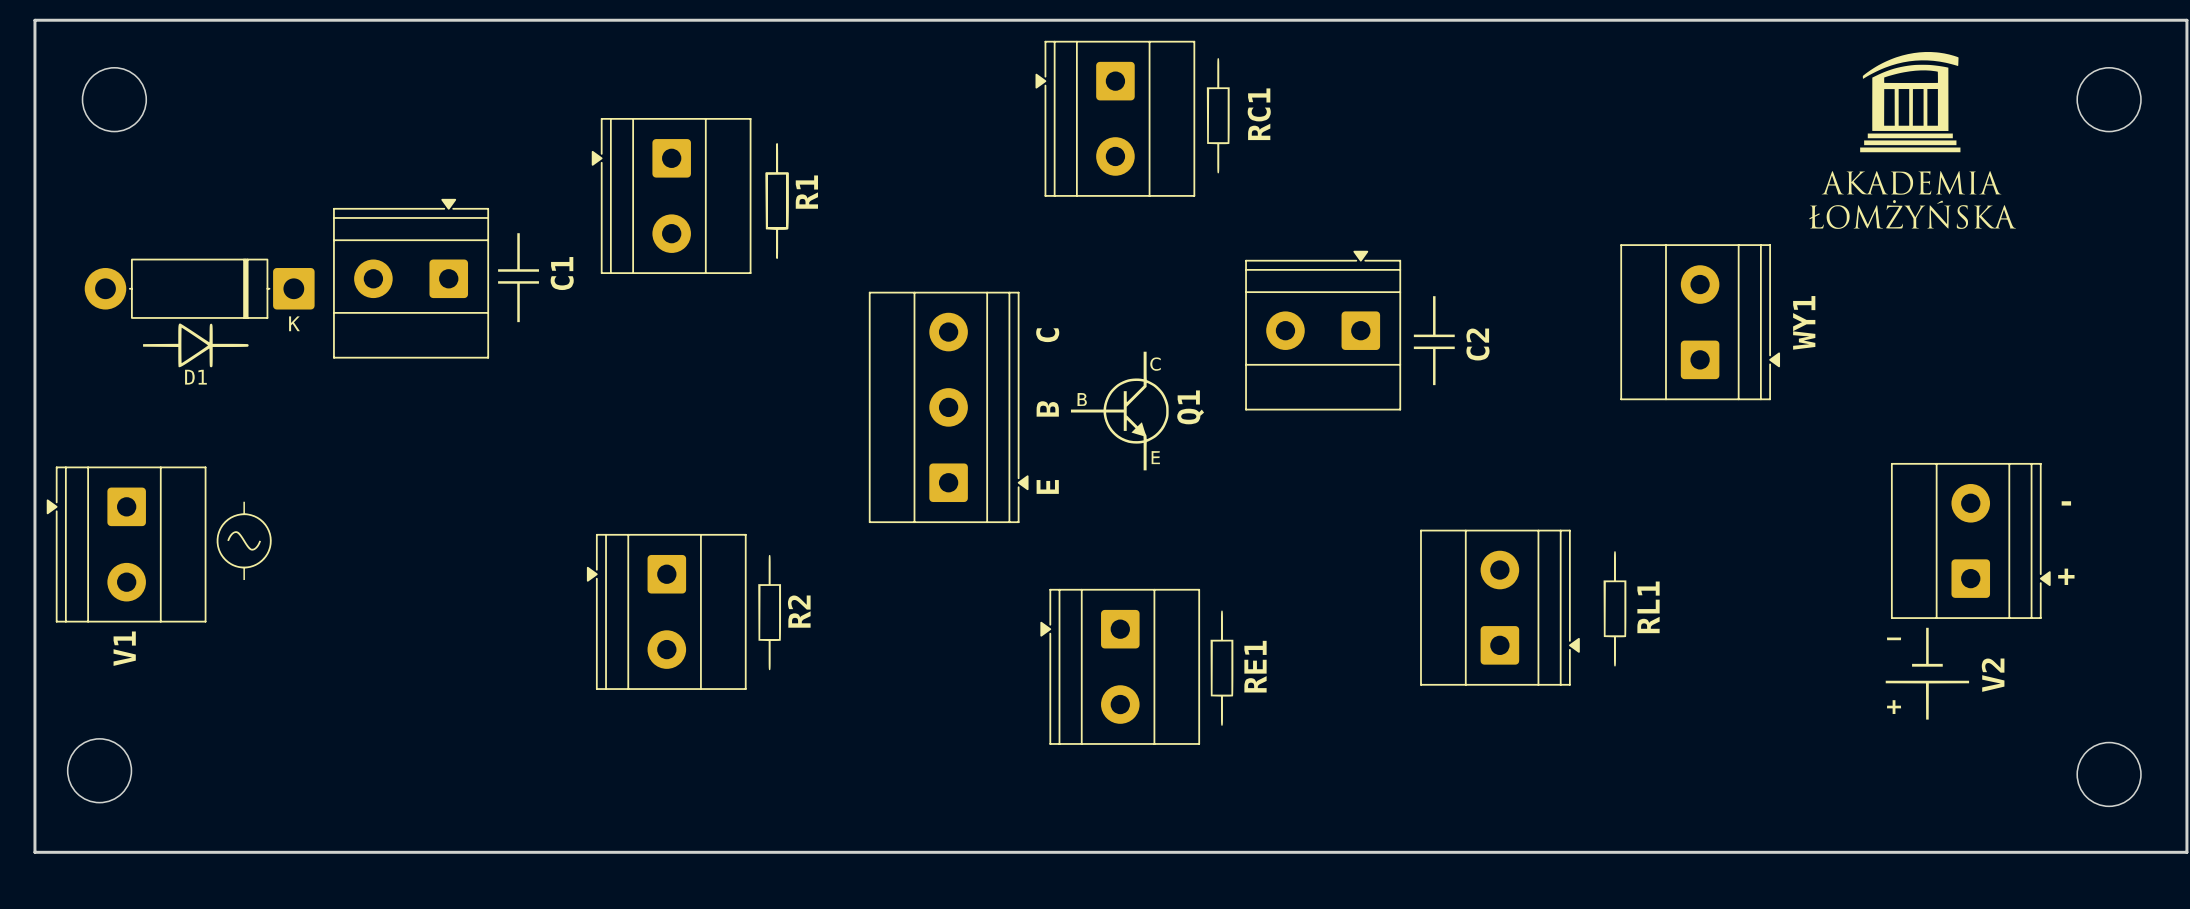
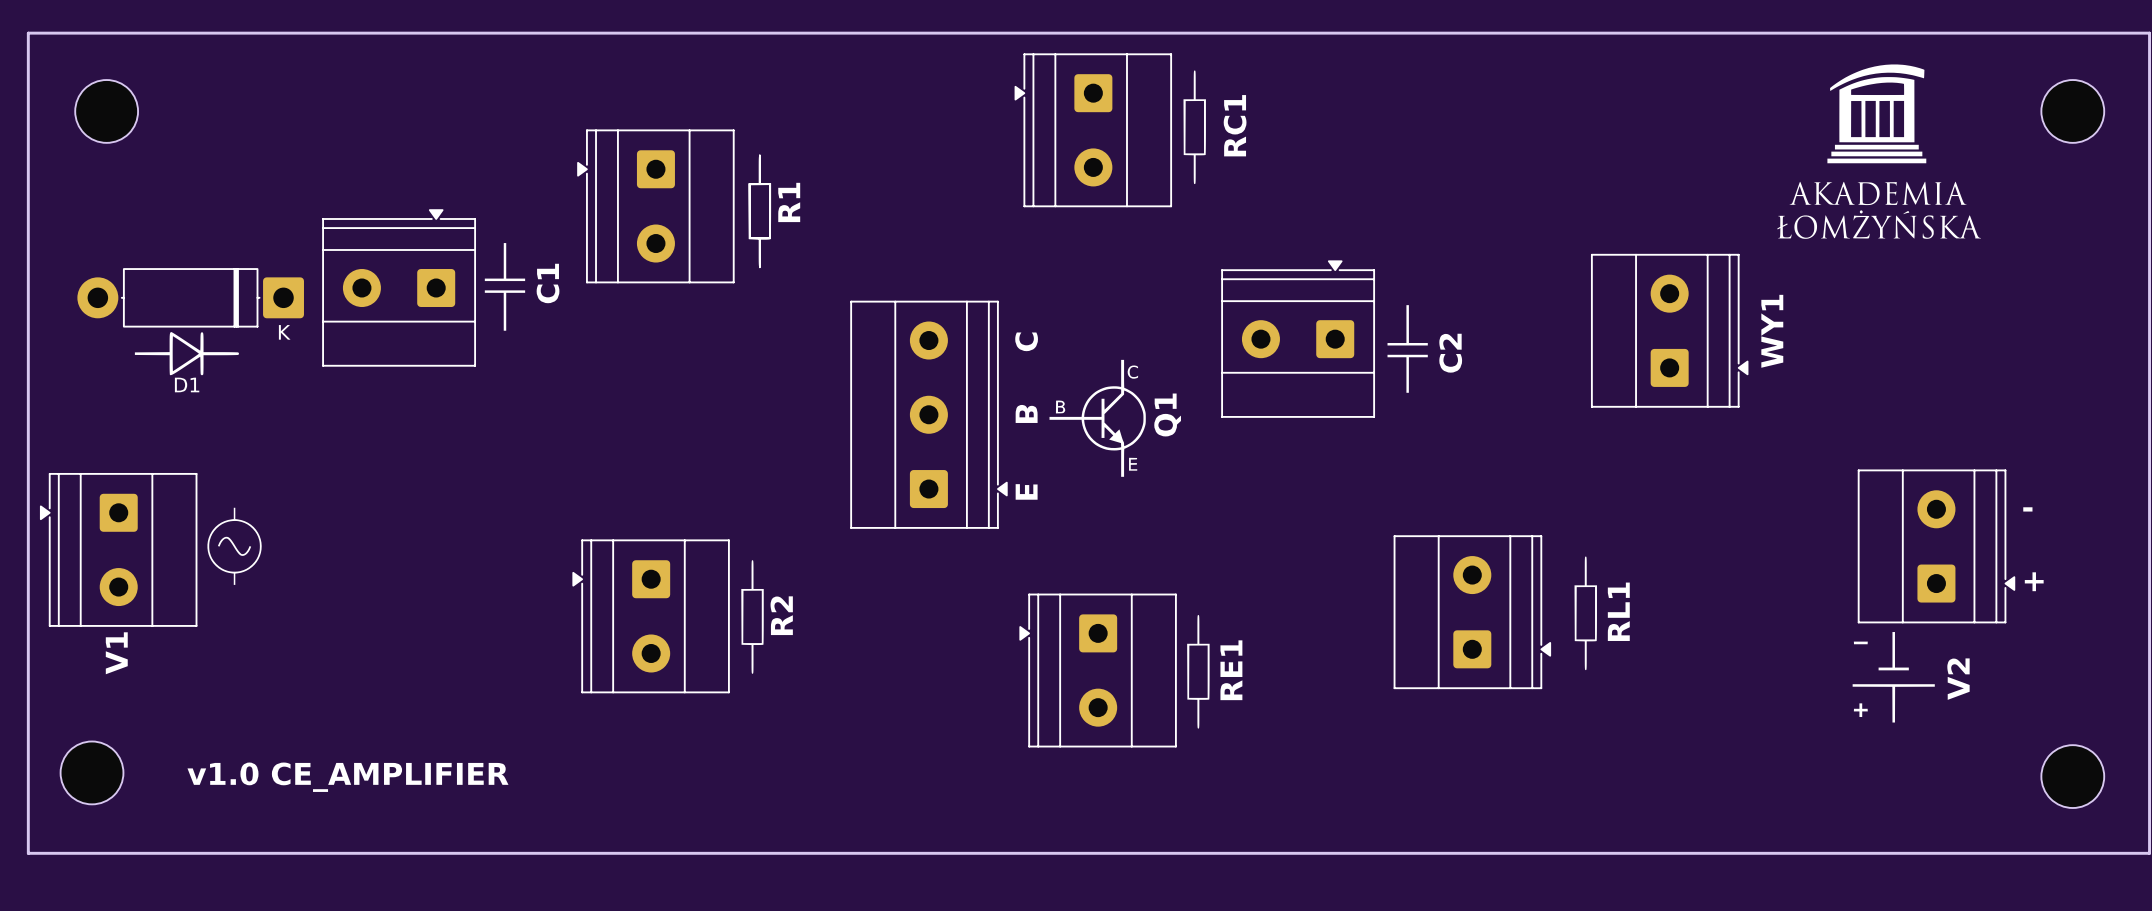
text: none -> v1.0 CE_AMPLIFIER (347, 777)

